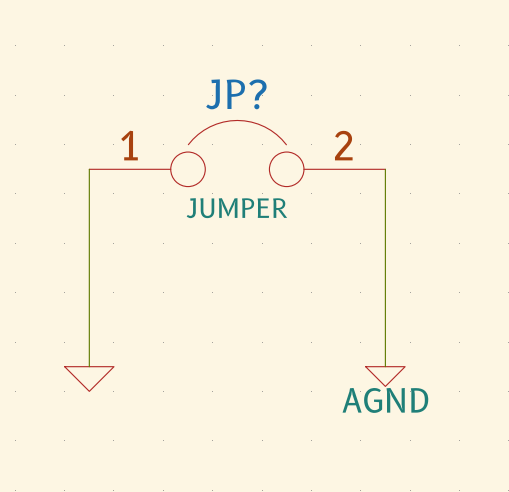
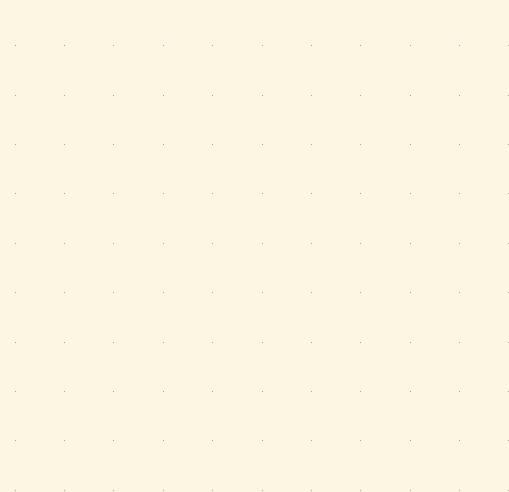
JP?: JUMPER (237, 153) -> none
wire: (89, 169) (89, 366) -> none
wire: (385, 169) (385, 366) -> none
power symbol: AGND (385, 376) -> none
power symbol: (89, 379) -> none

